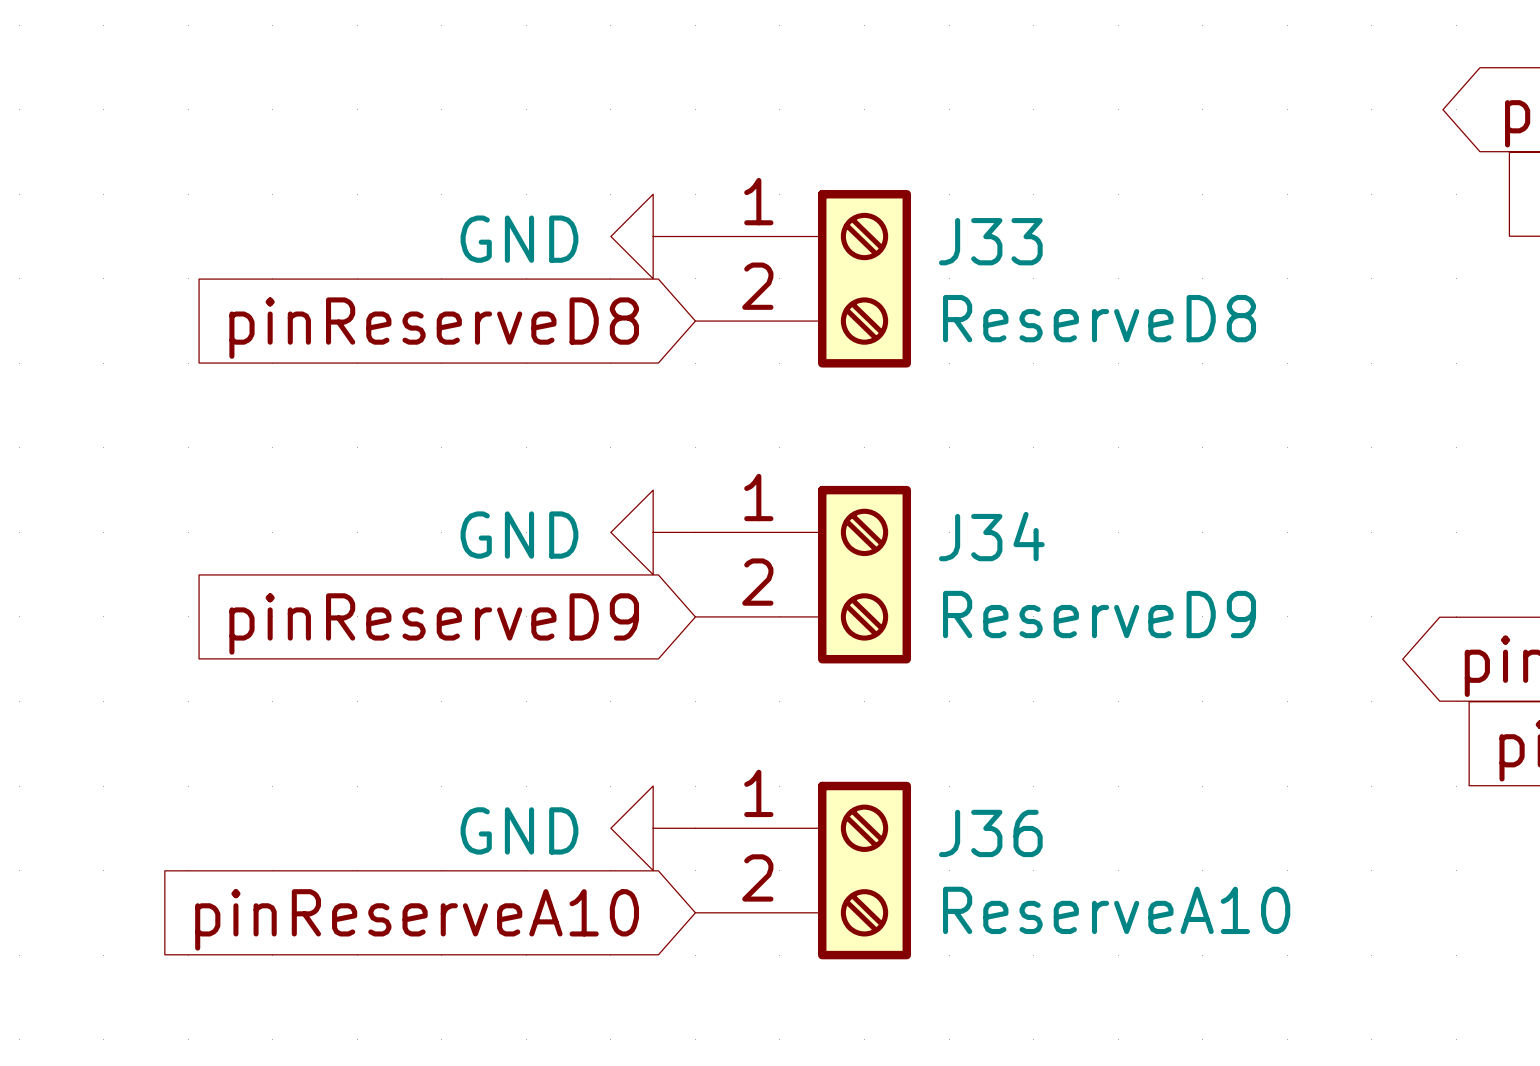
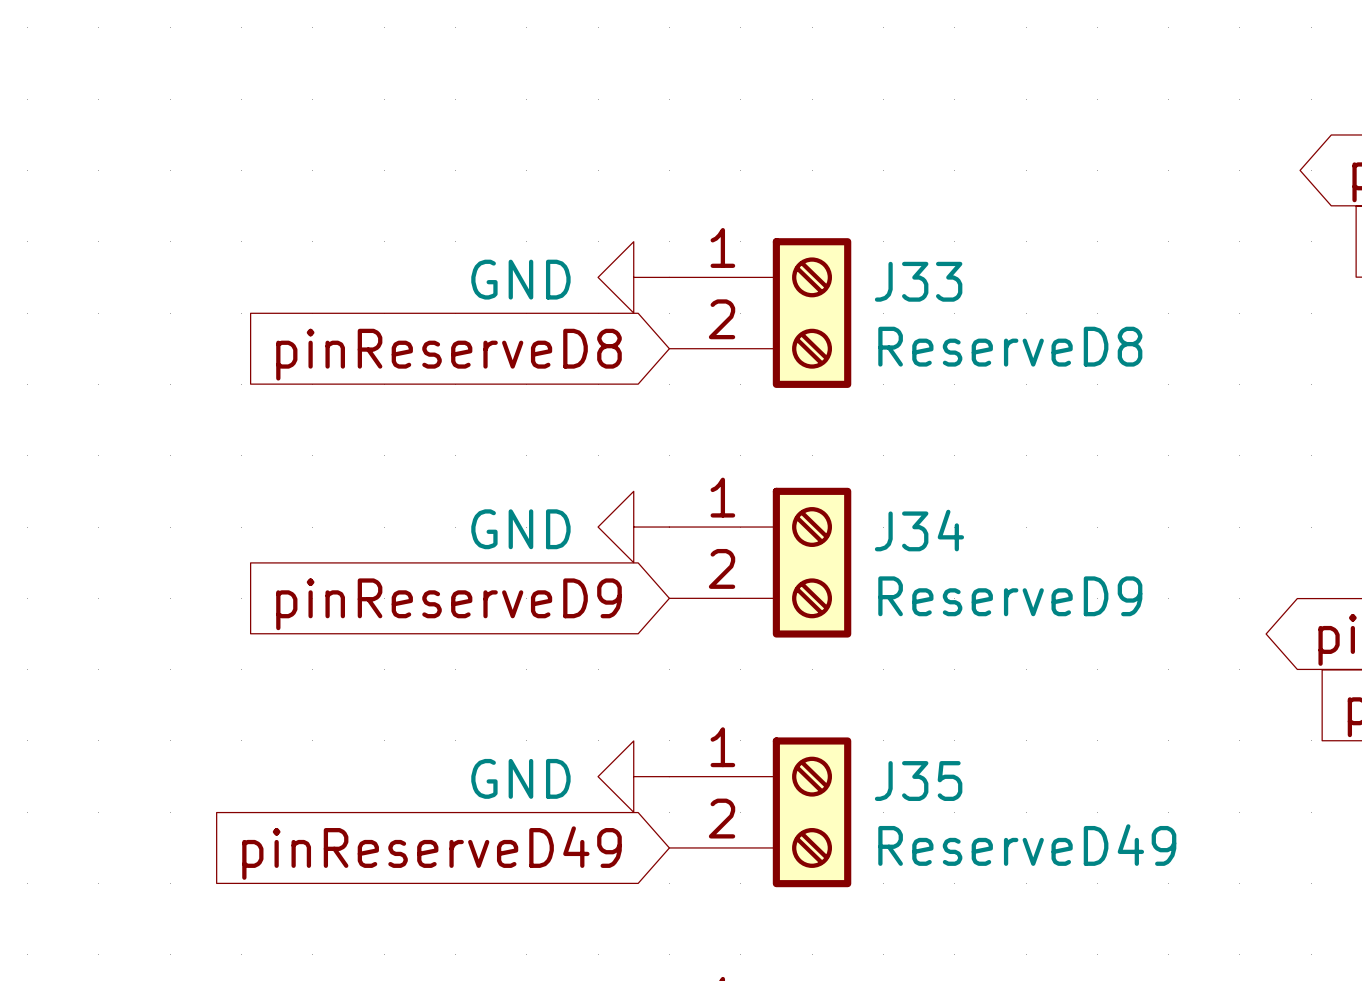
J36 name: J36 (990, 833) -> J35 (918, 781)
J36 value: ReserveA10 (1116, 910) -> ReserveD49 (1027, 845)
global label: pinReserveA10 (417, 919) -> pinReserveD49 (432, 853)

